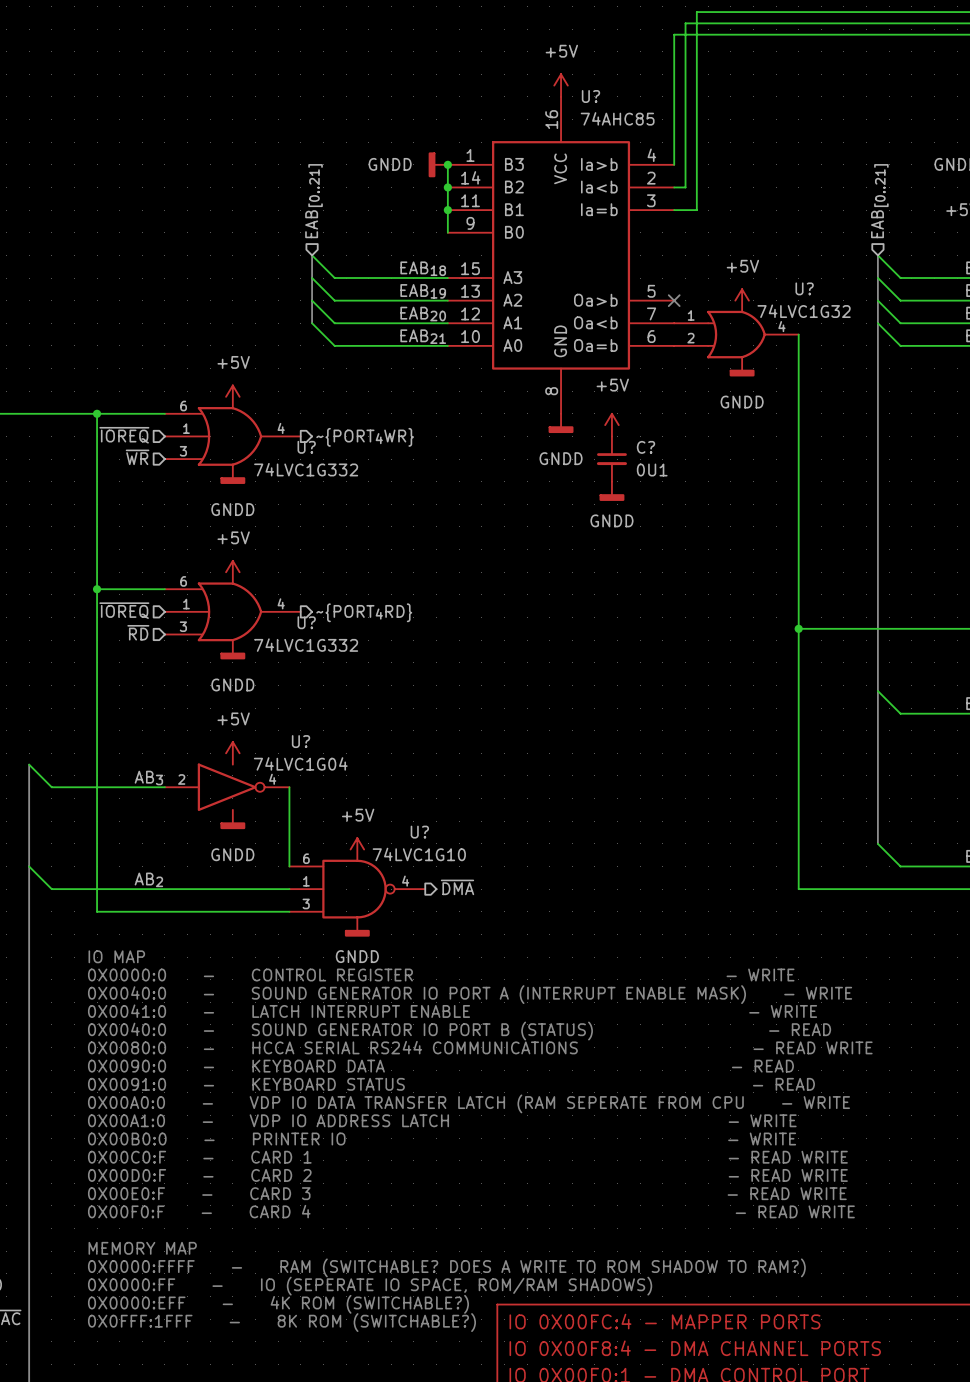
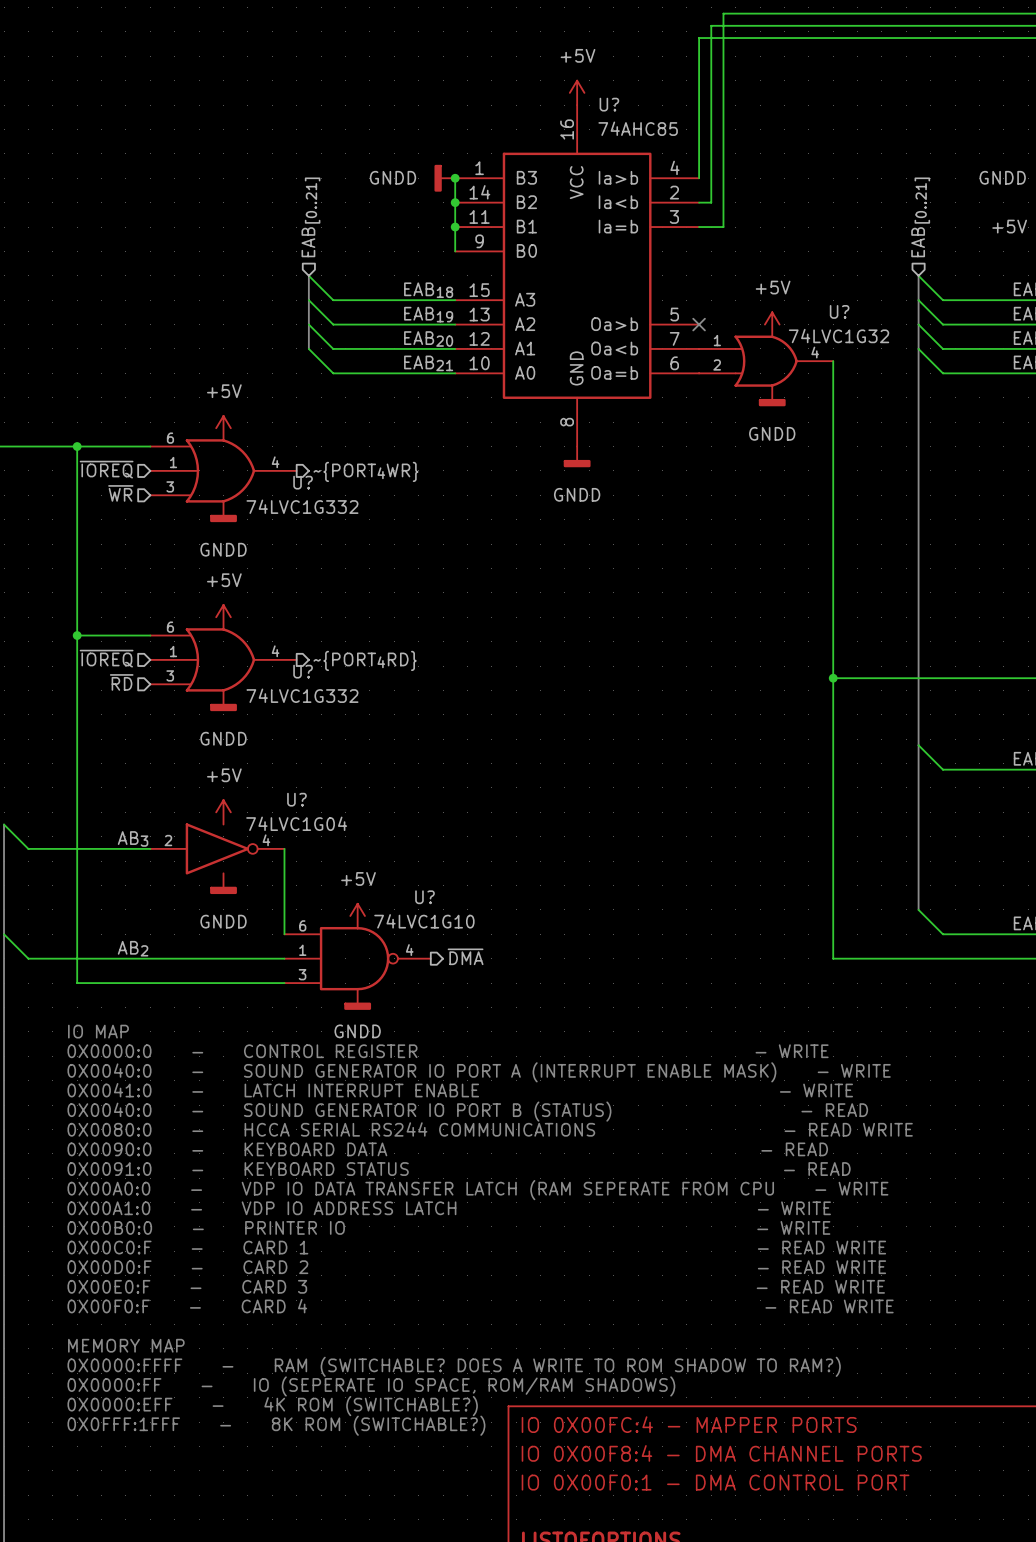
power symbol: +5V (611, 425) -> none
C?: 0U1 (611, 459) -> none
power symbol: GNDD (611, 491) -> none

